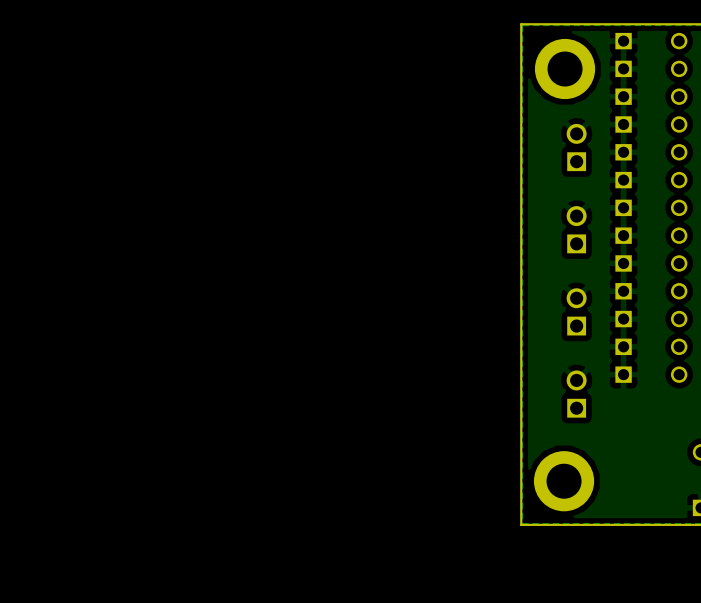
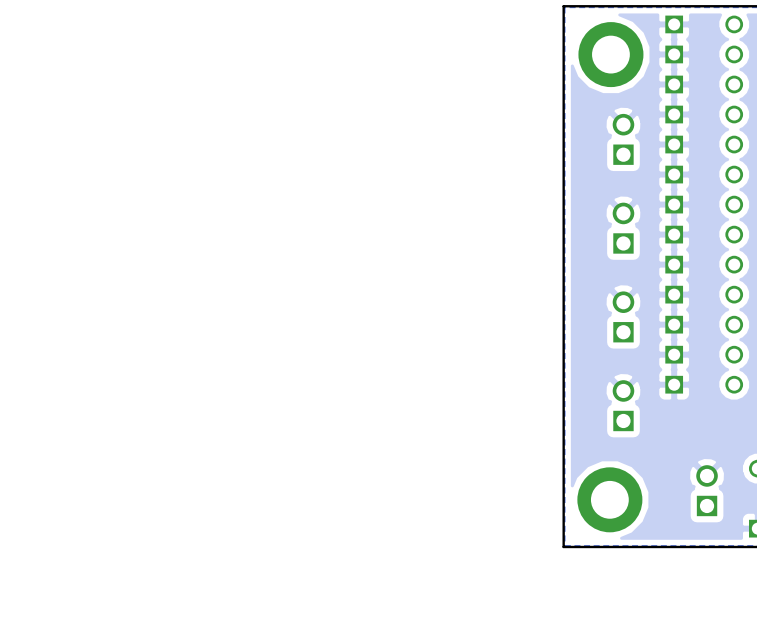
part: none -> (707, 490)

